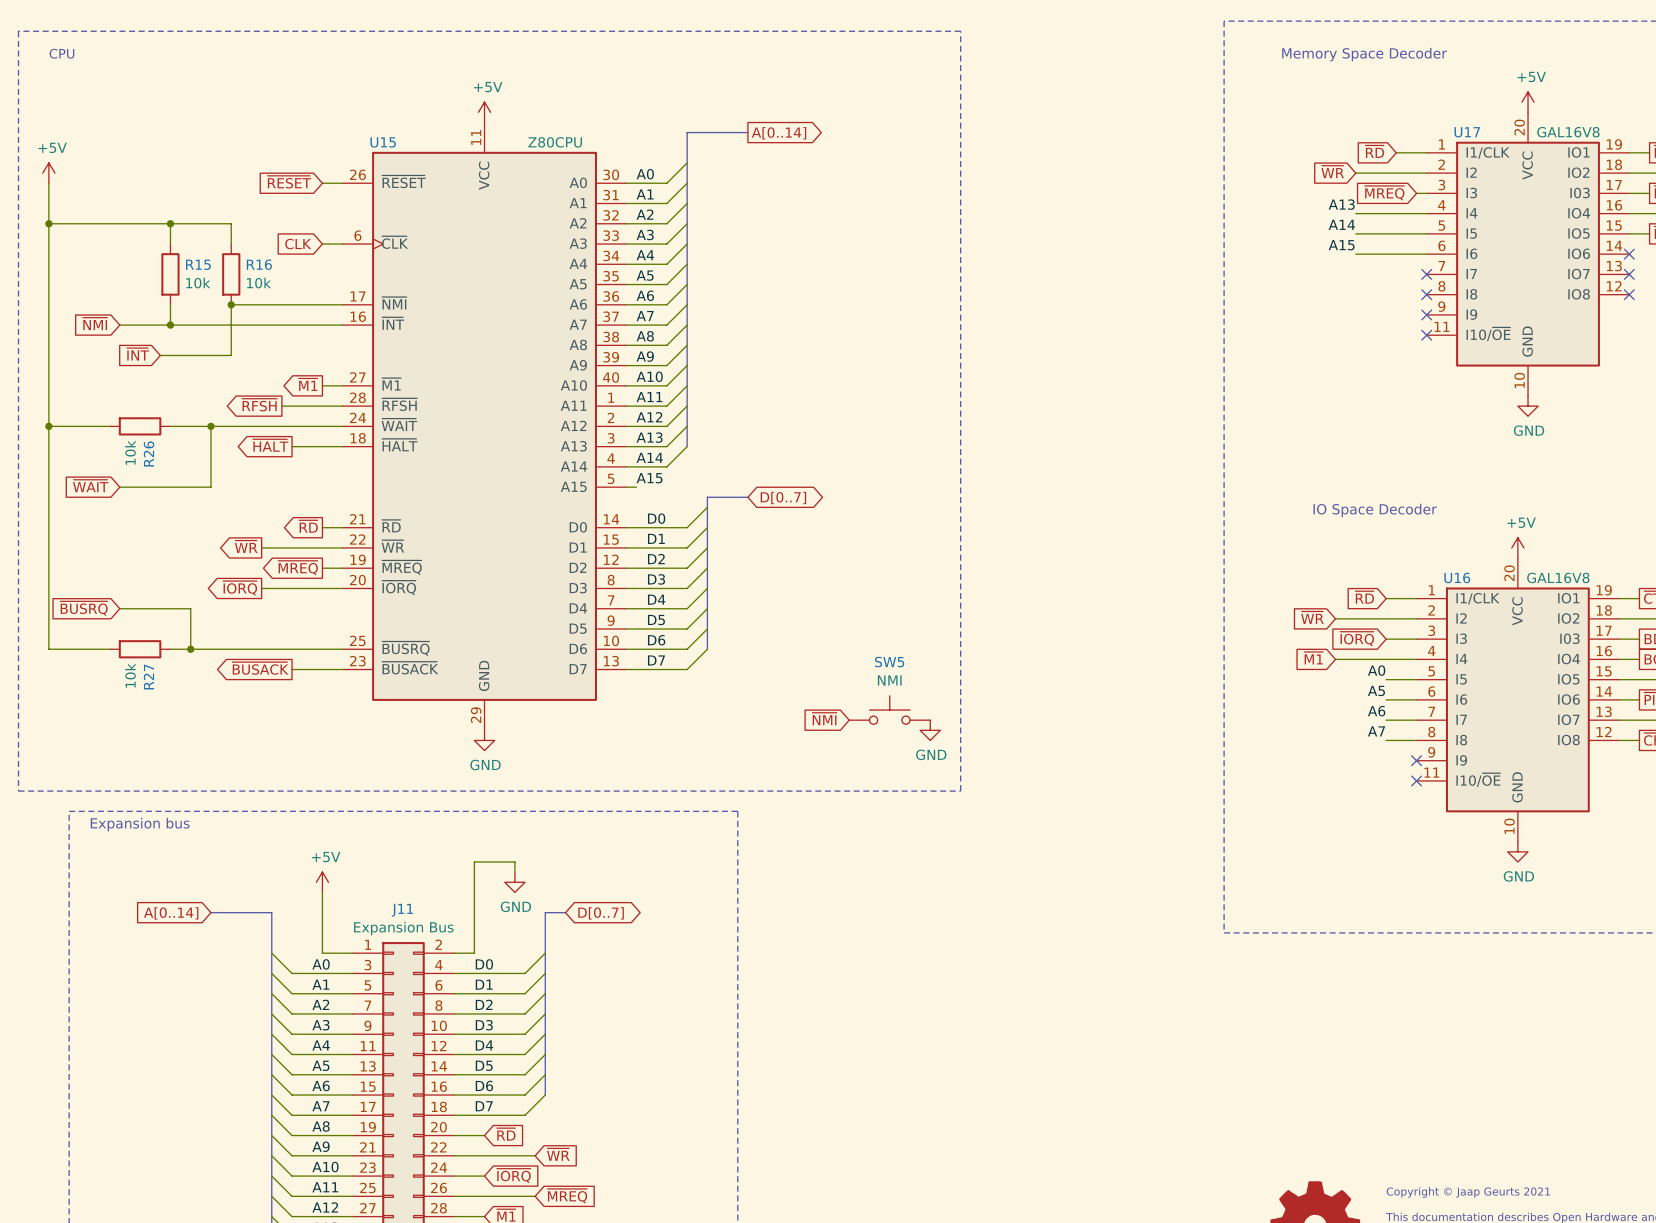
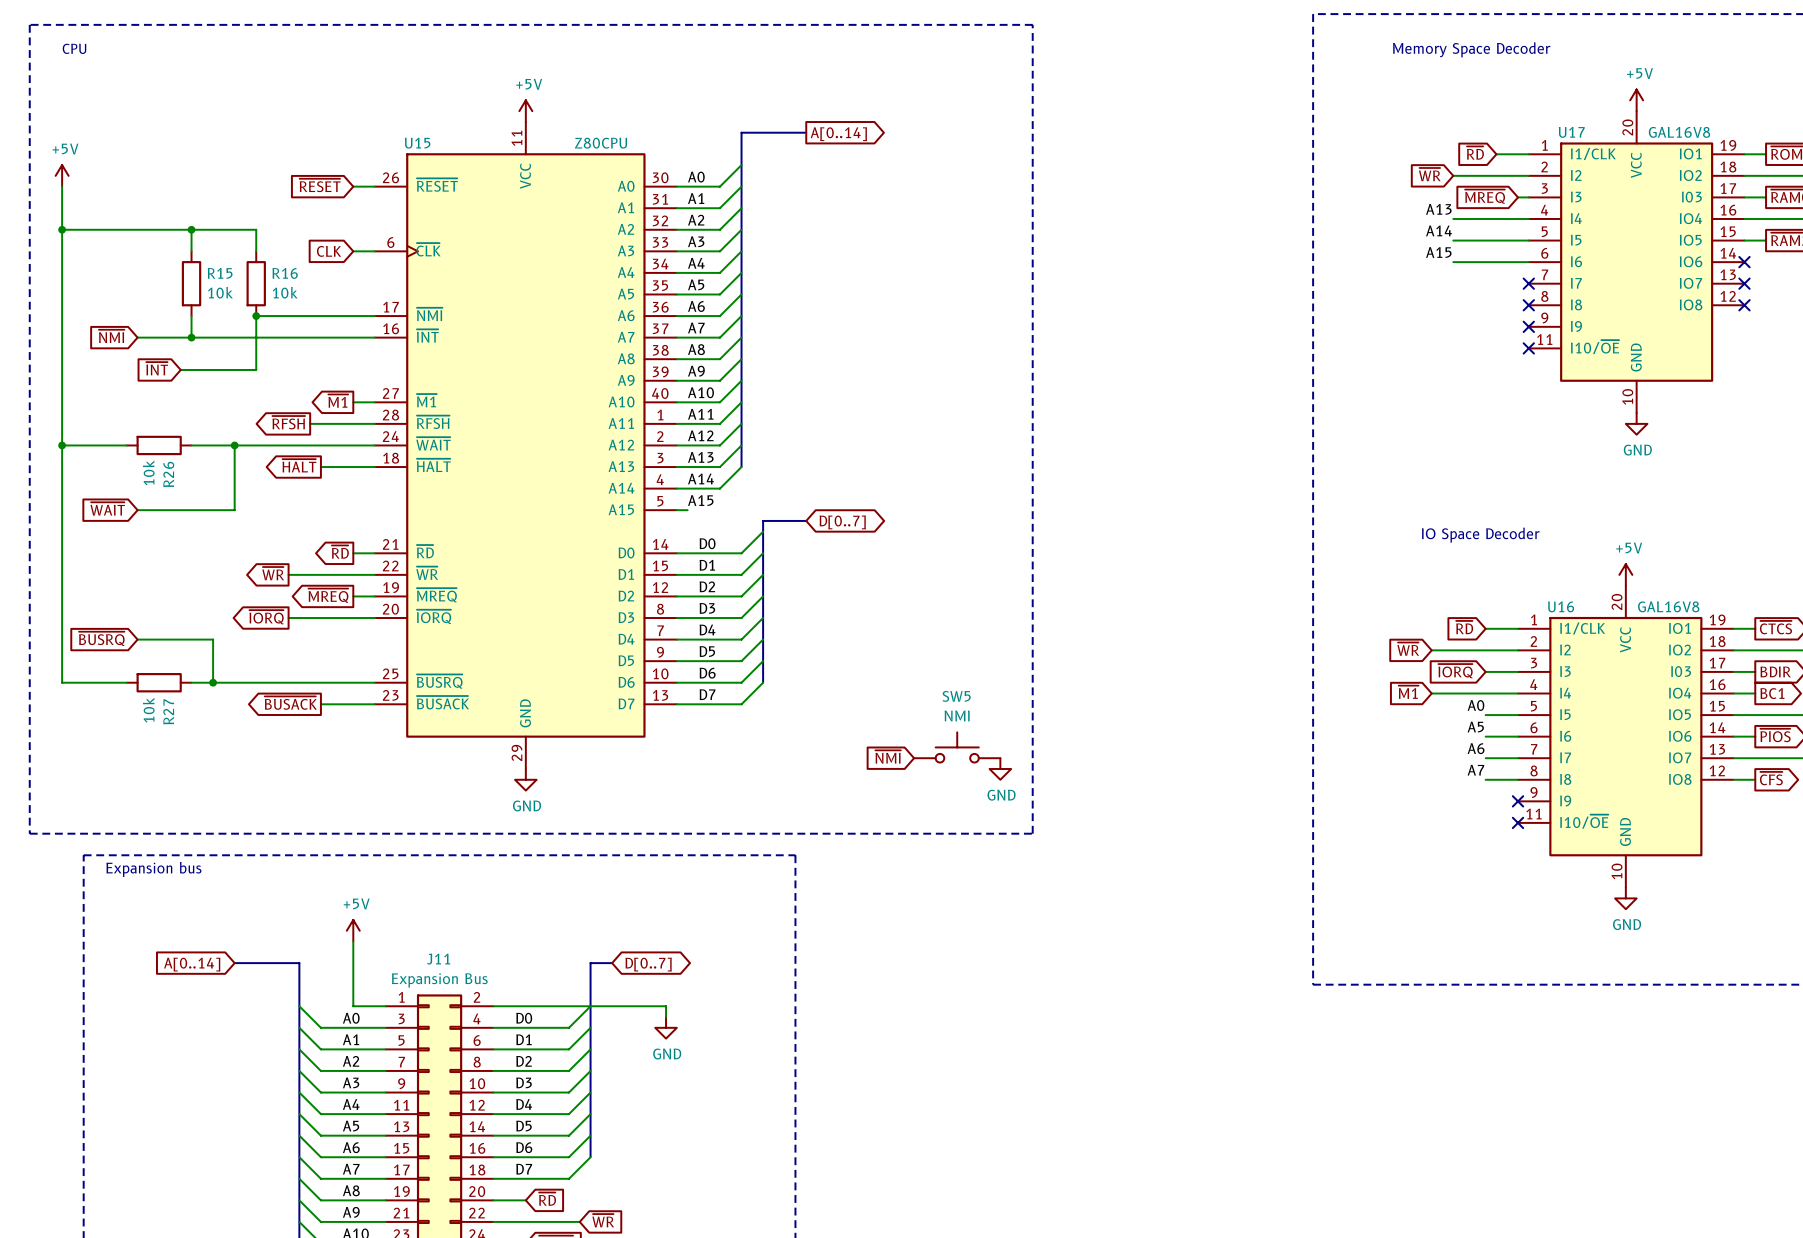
wire: (514, 872) (514, 862) (474, 862) (474, 953) -> (666, 1017) (666, 1006) (515, 1006)
power symbol position: GND (514, 882) -> GND (666, 1027)

